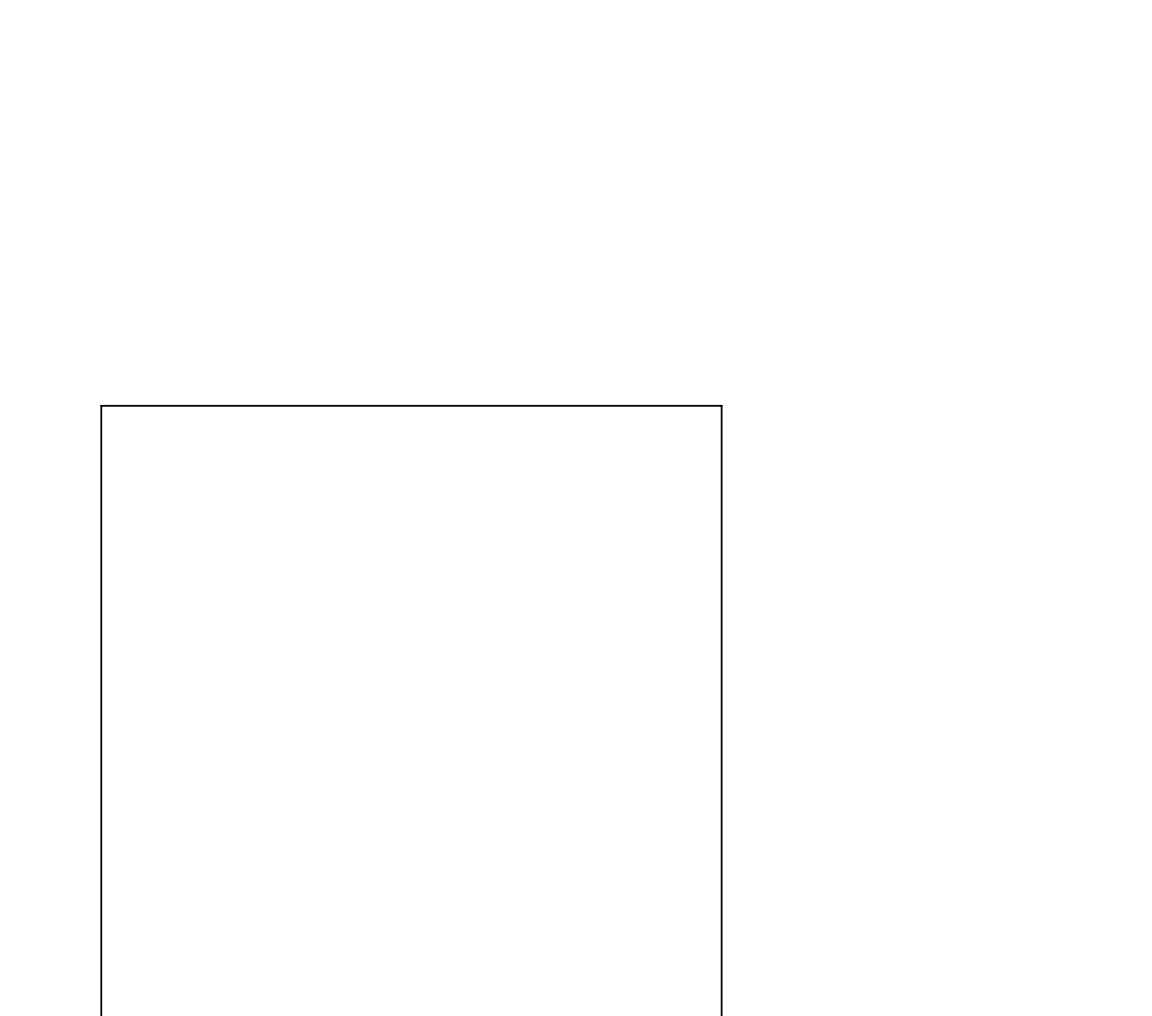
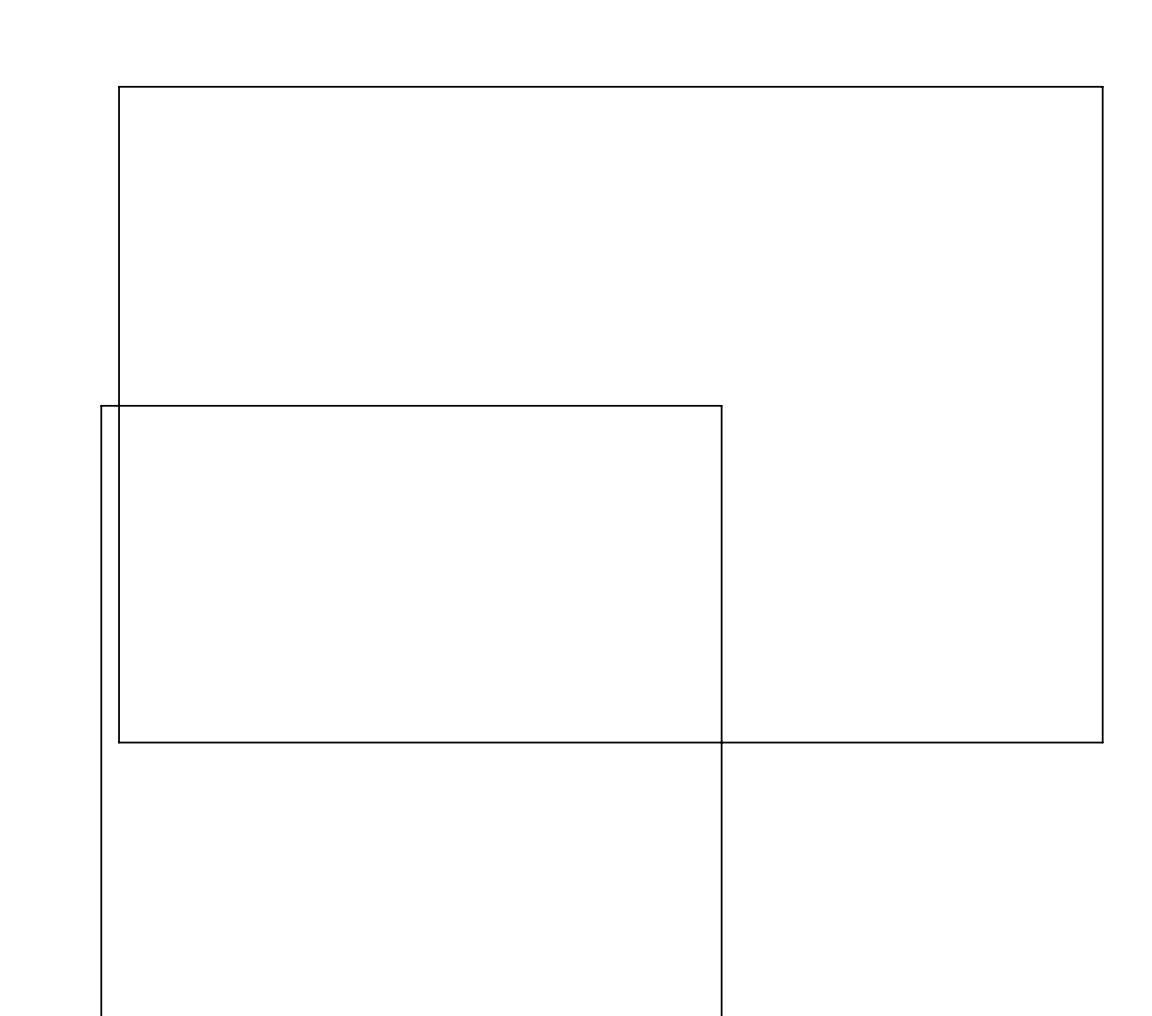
board edge: none -> (1102, 86) (119, 86) (119, 742) (1102, 742) (1102, 86)

